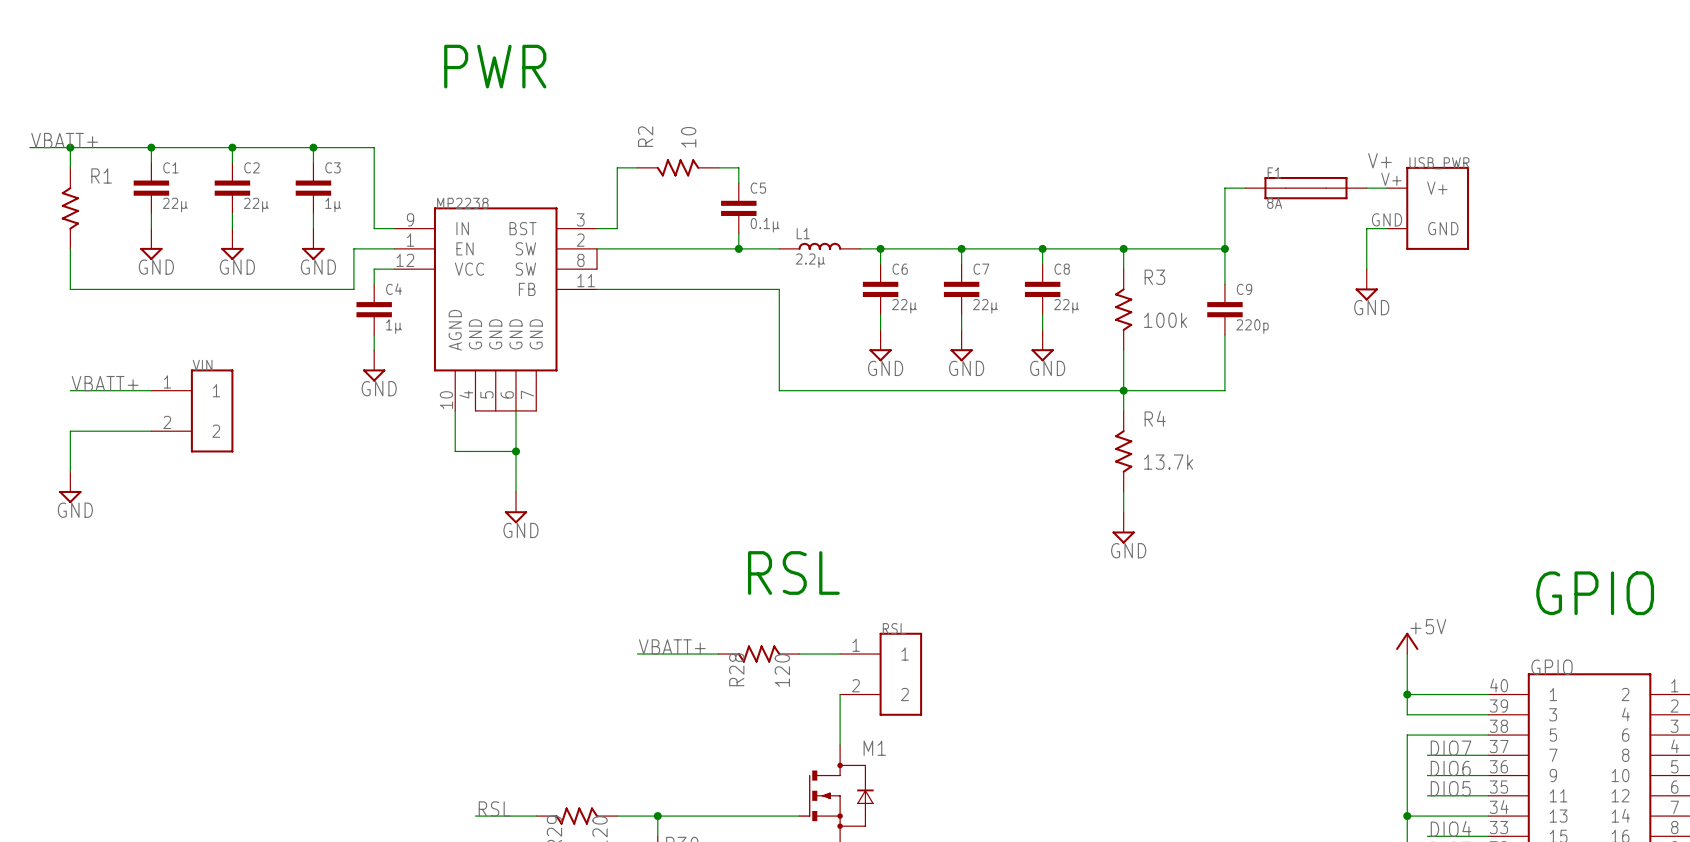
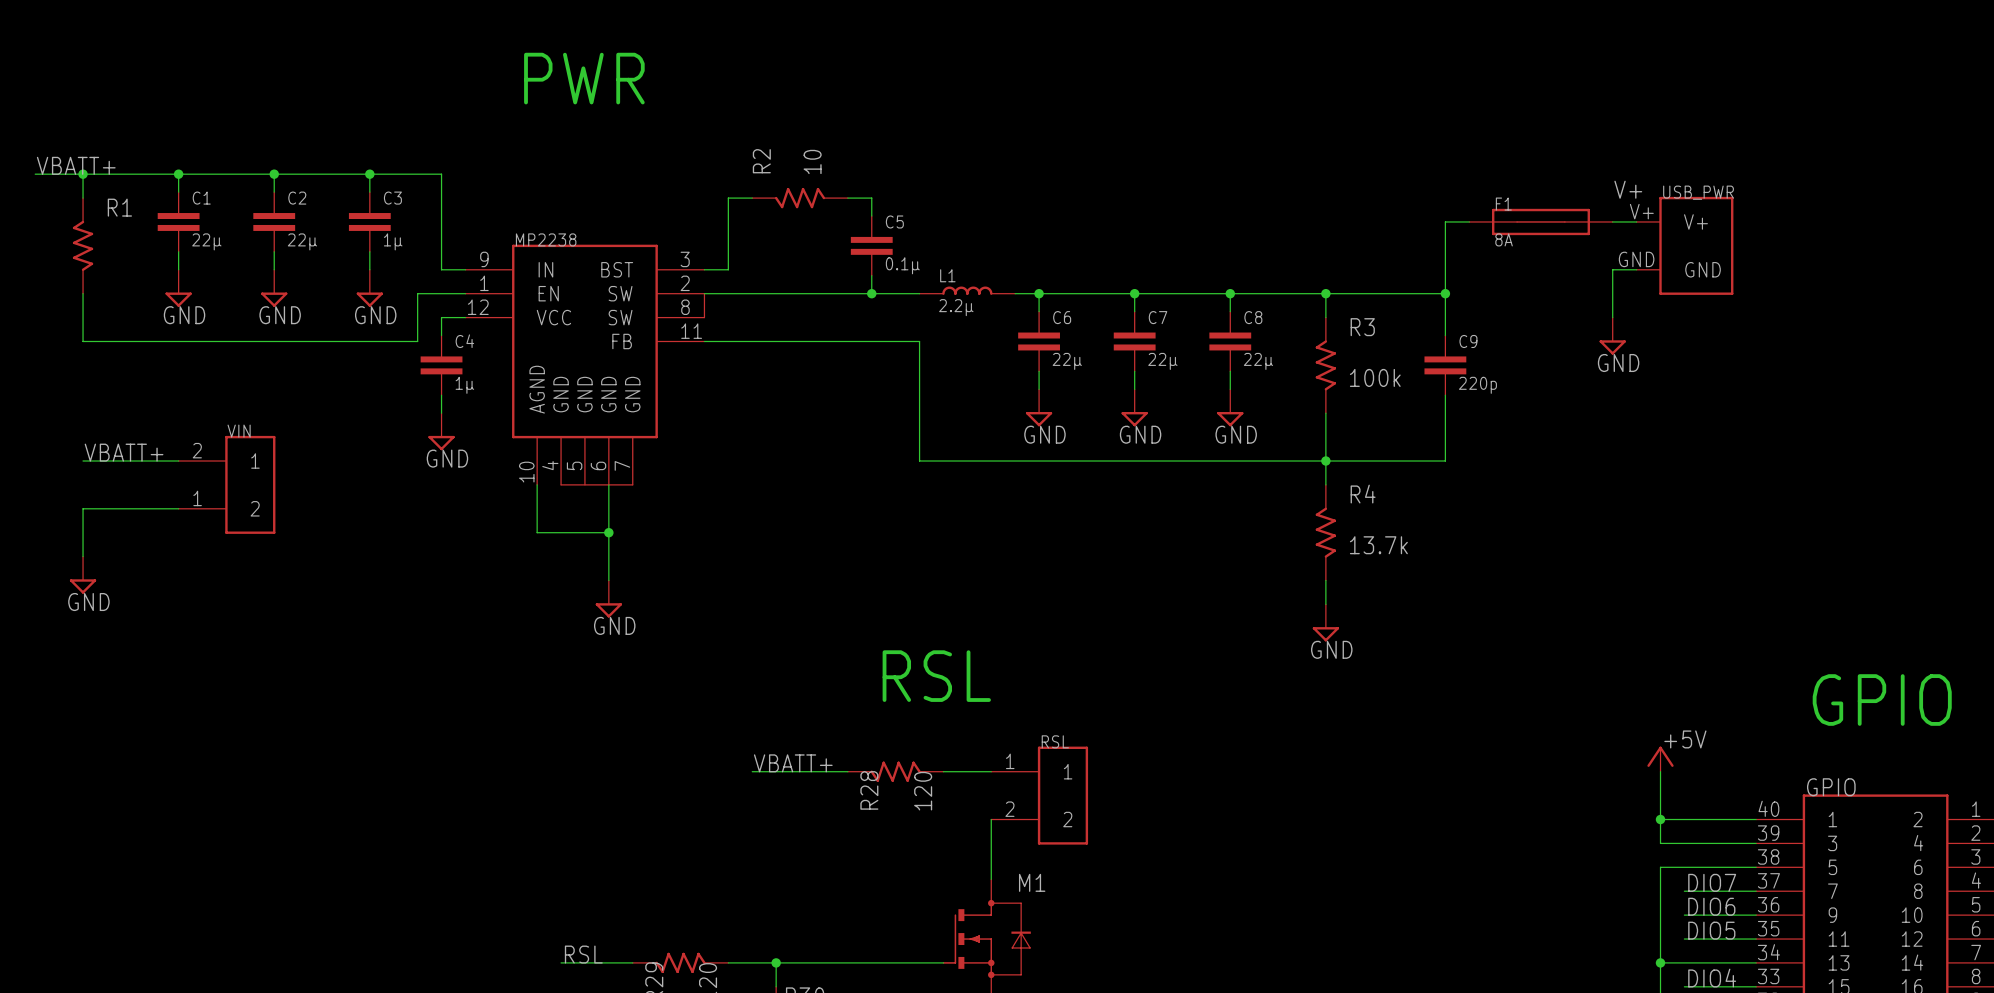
VIN pin number: 1 (167, 381) -> 2 (197, 450)
VIN pin number: 2 (167, 422) -> 1 (197, 498)

